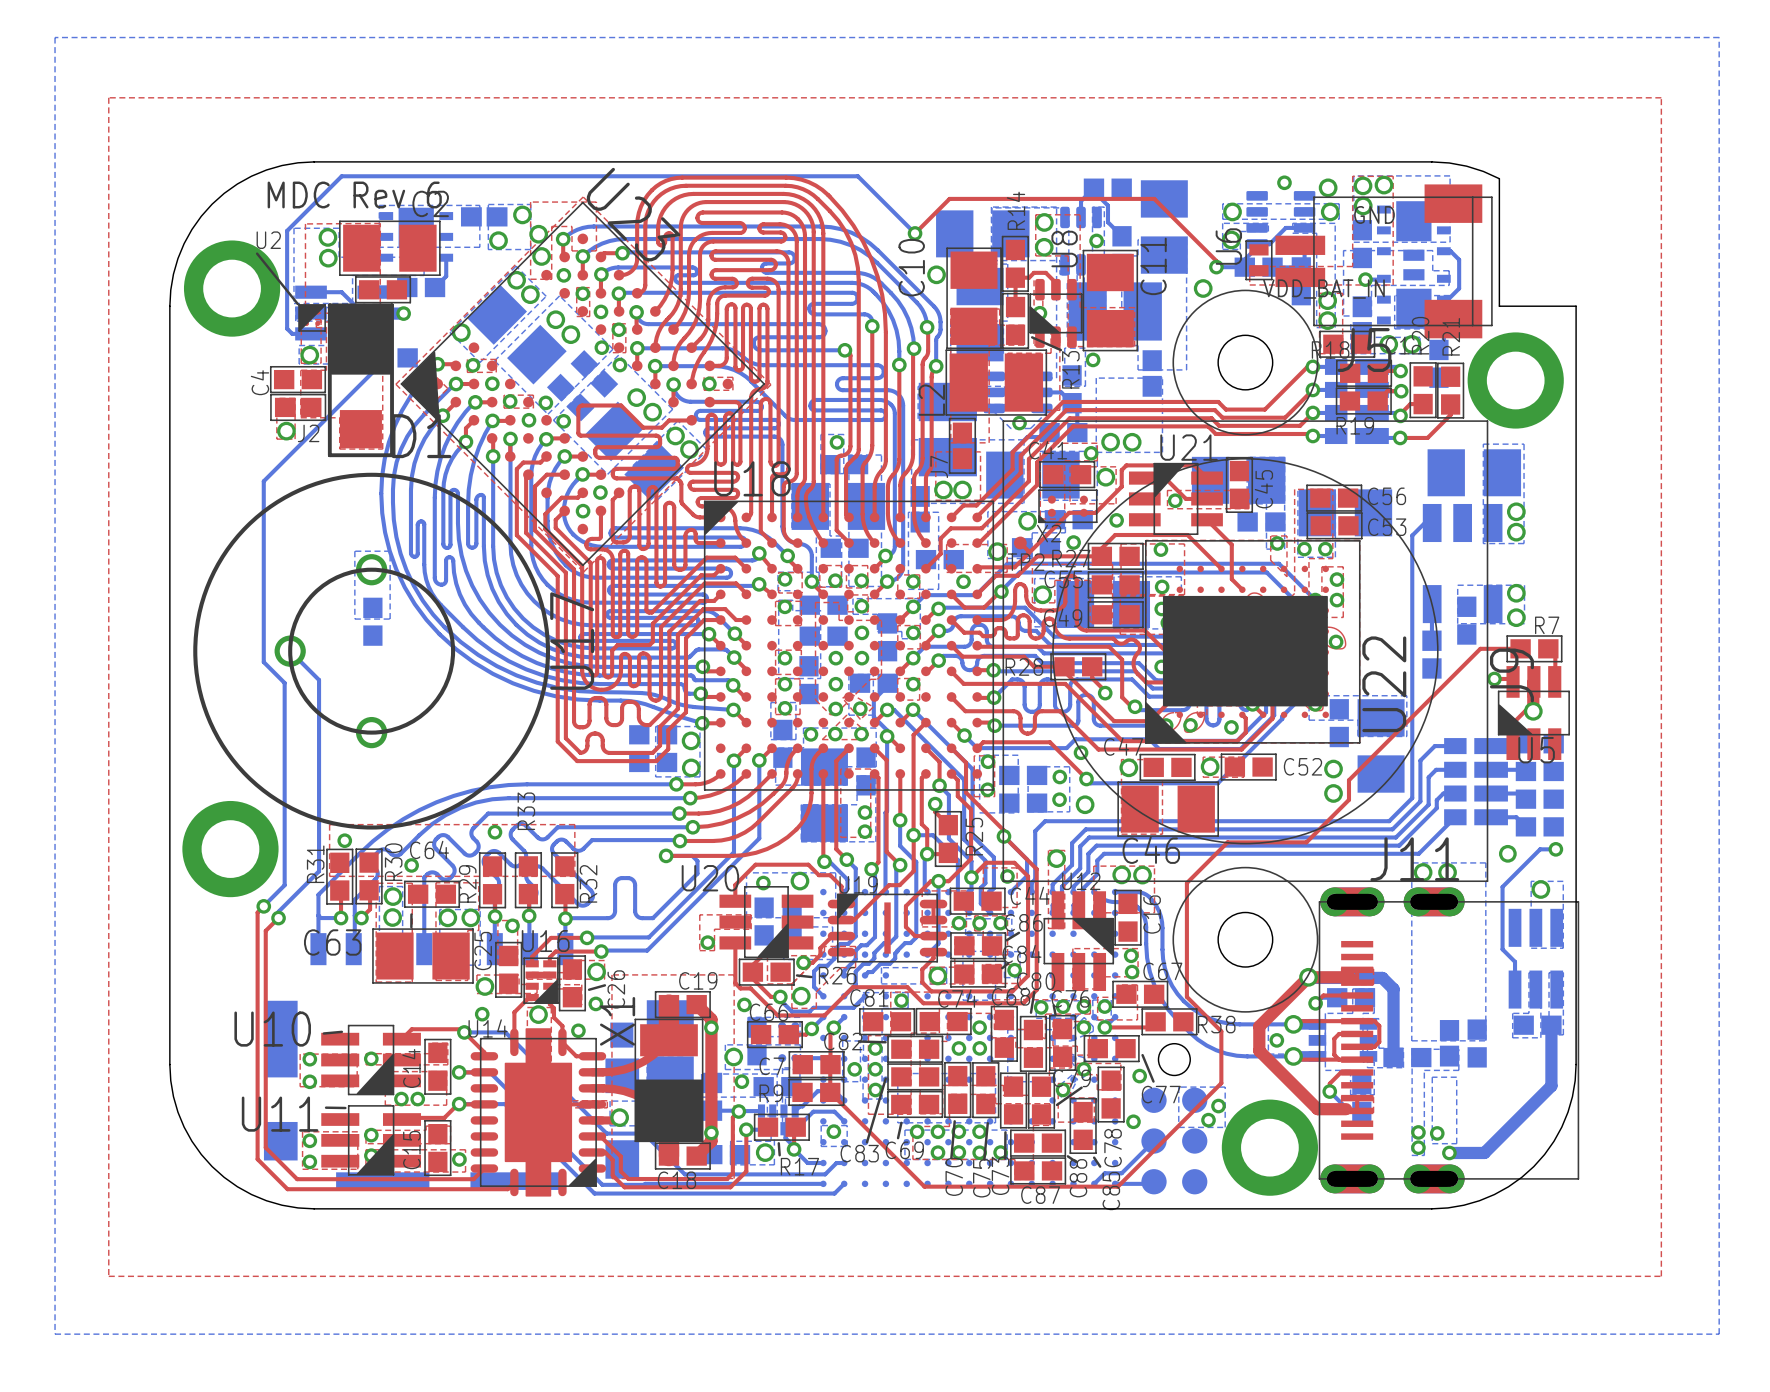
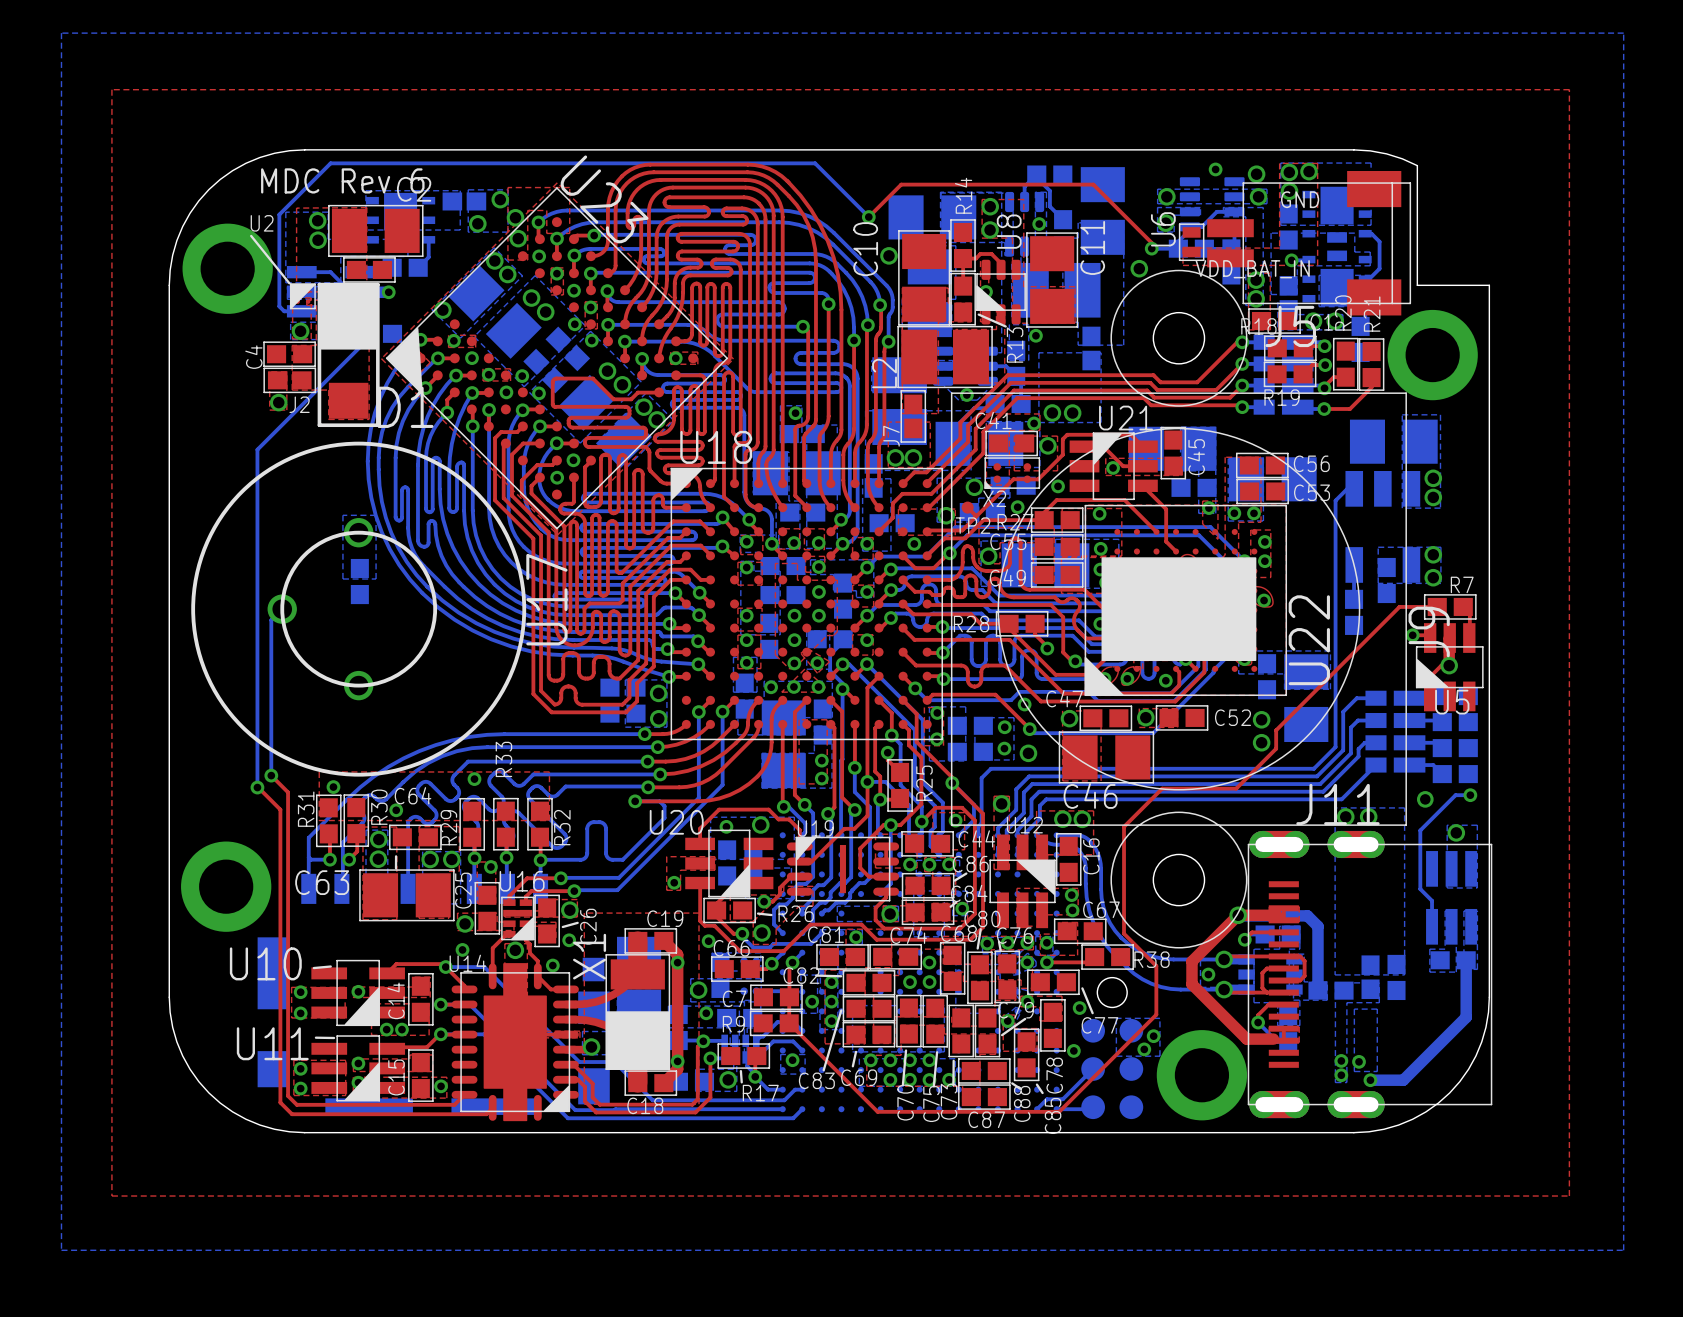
bottom track: (290, 651) (319, 680) (319, 871) (278, 911) (278, 918) -> (282, 609) (271, 620) (271, 775)
bottom track: (263, 662) (284, 683) (284, 885) (263, 906) -> (257, 619) (257, 787)
via: none -> (271, 775)
via: none -> (257, 787)
via position: (230, 849) -> (226, 886)
top track: (263, 906) (257, 912) (257, 1159) (287, 1189) (300, 1189) -> (257, 787) (280, 809) (280, 1102) (292, 1114)
via: (263, 906) -> none
top track: (278, 918) (265, 930) (265, 1147) (297, 1179) (305, 1179) -> (271, 775) (288, 792) (288, 1095) (296, 1104)
via: (278, 918) -> none

